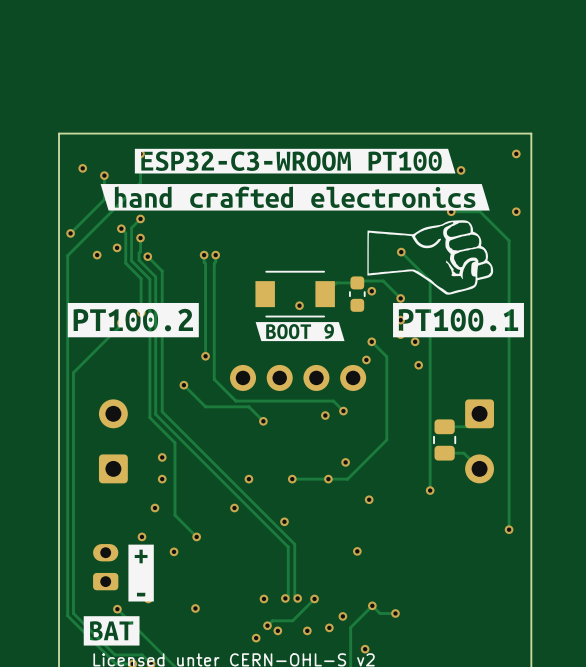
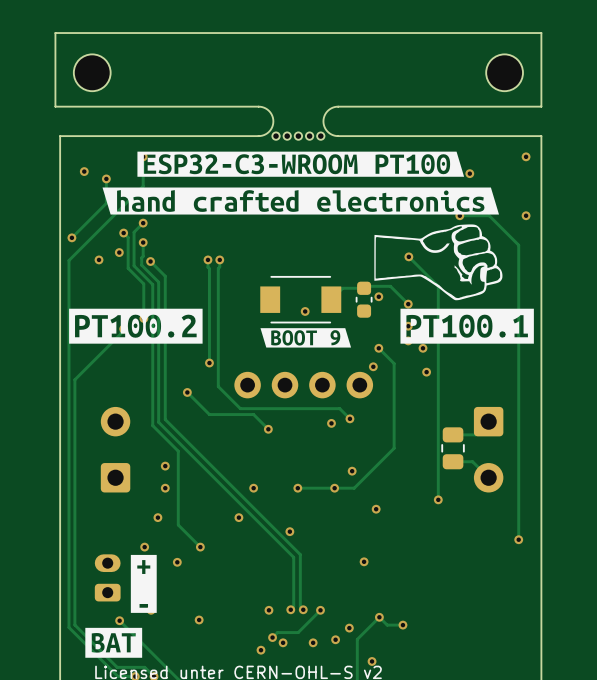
part: none -> (92, 72)
part: none -> (504, 72)
part: none -> (298, 136)
board edge: (331, 133) (253, 133) -> (338, 136) (328, 132) (323, 121) (327, 111) (336, 106) (541, 106) (541, 33) (55, 33) (55, 106) (260, 106) (270, 113) (273, 123) (268, 132) (258, 136)

